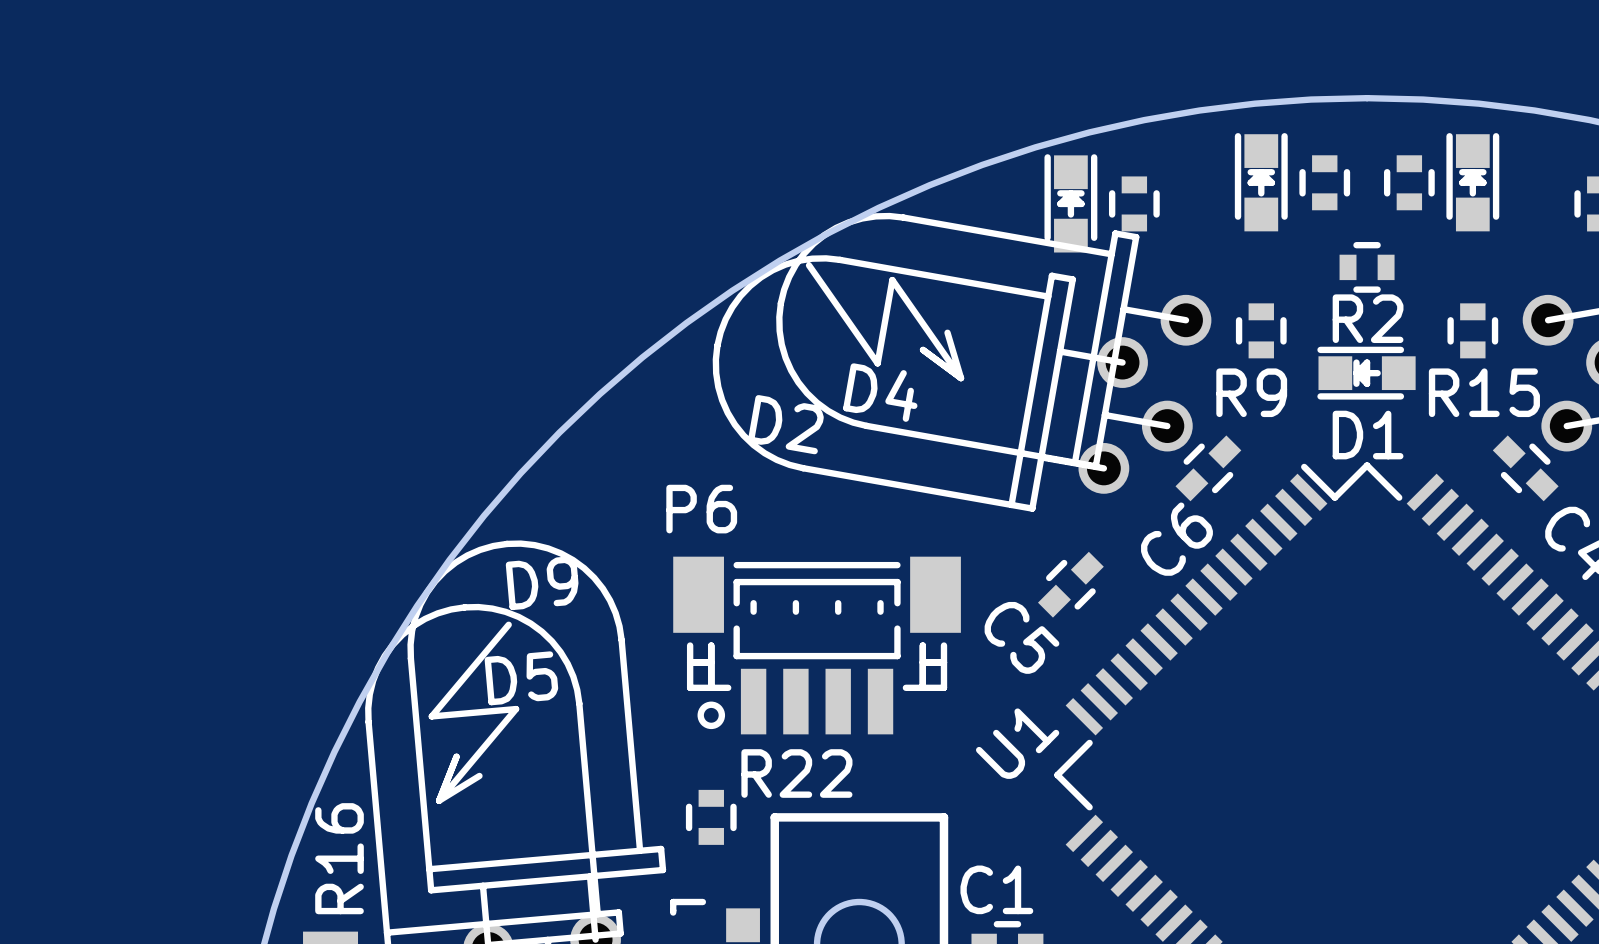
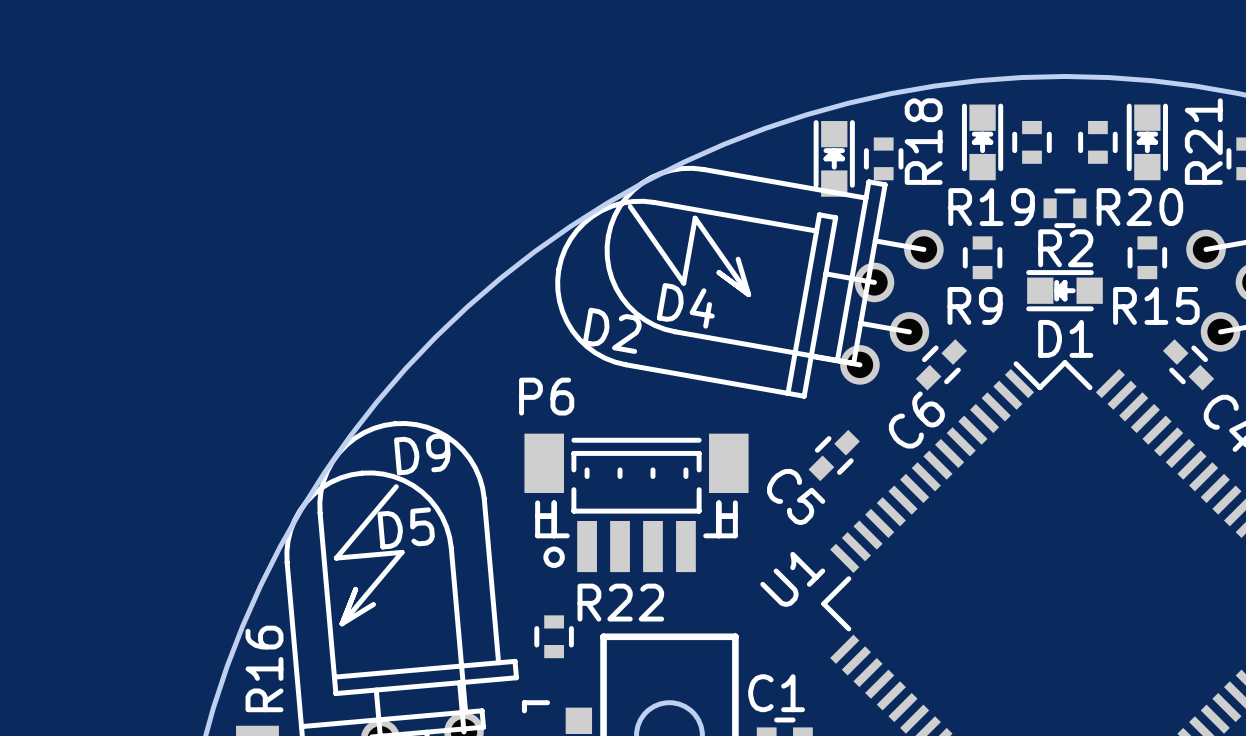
R18 name: none -> R18 (923, 141)
R21 name: none -> R21 (1203, 141)
R19 name: none -> R19 (991, 207)
R20 name: none -> R20 (1139, 207)

